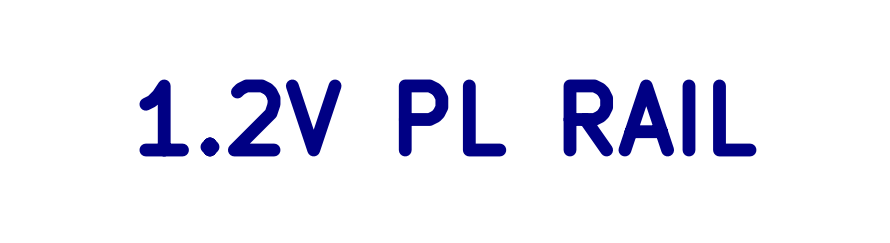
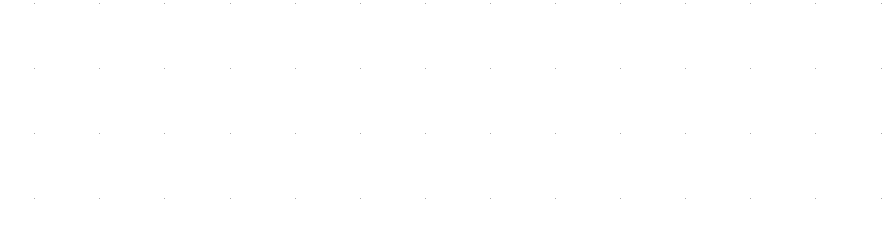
text: 1.2V PL RAIL (447, 117) -> none

